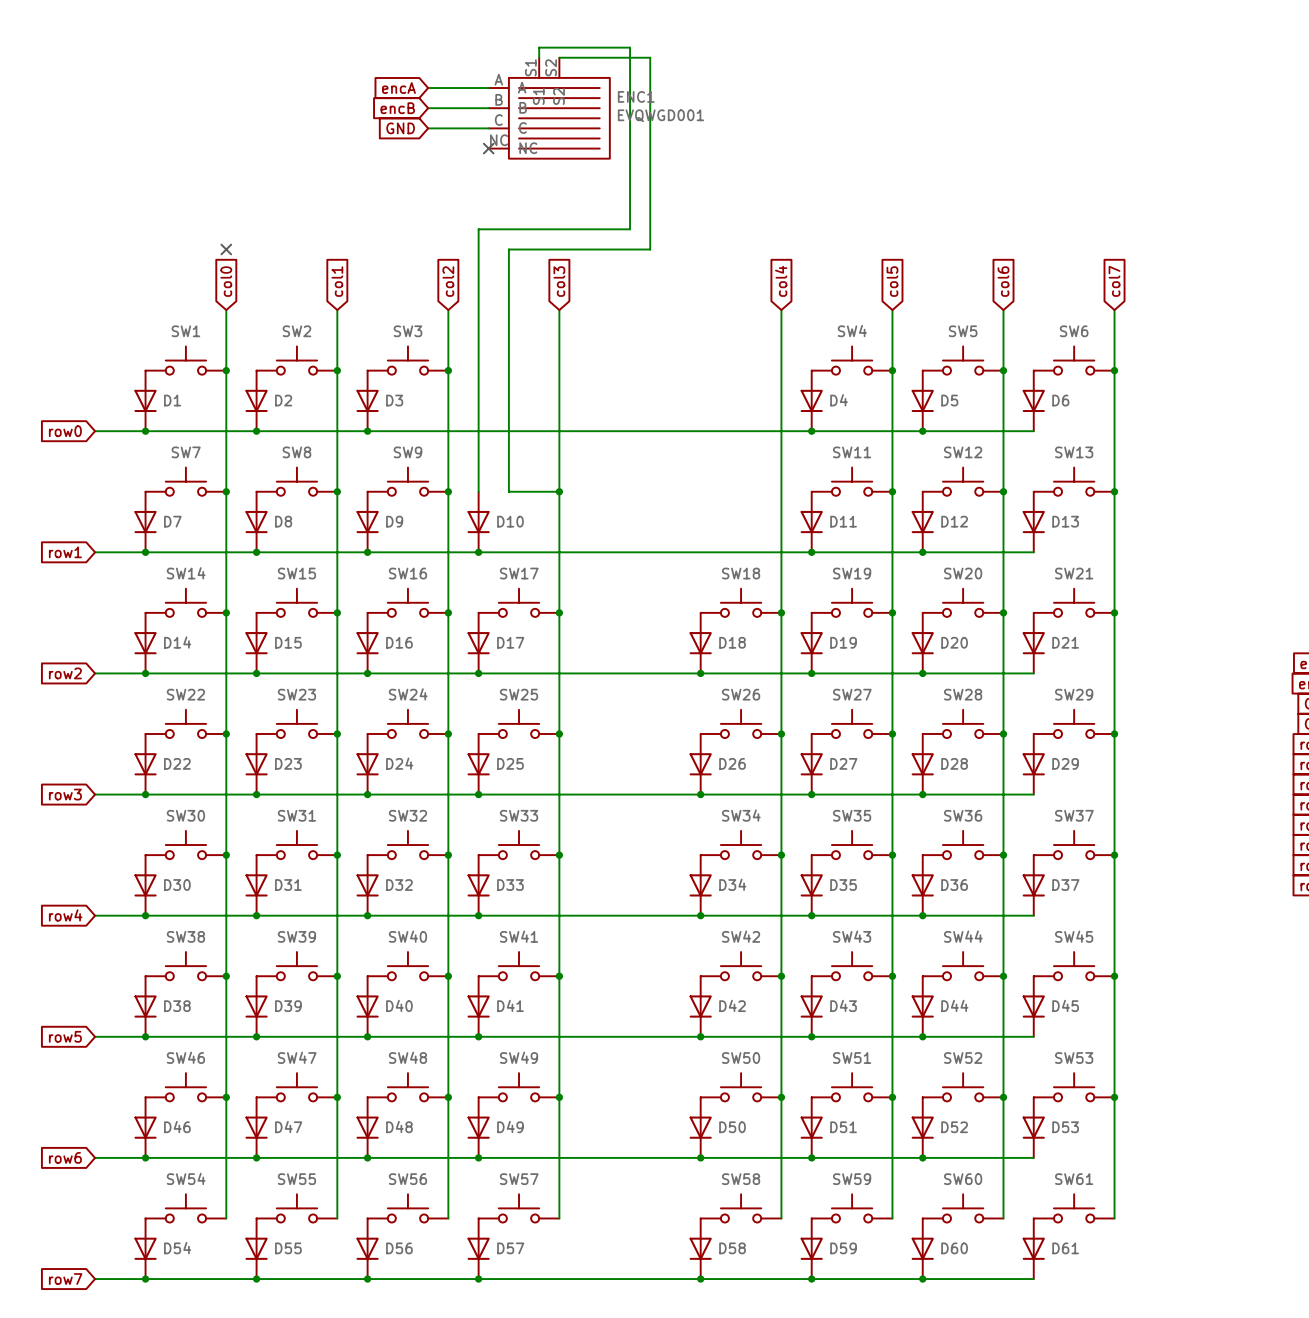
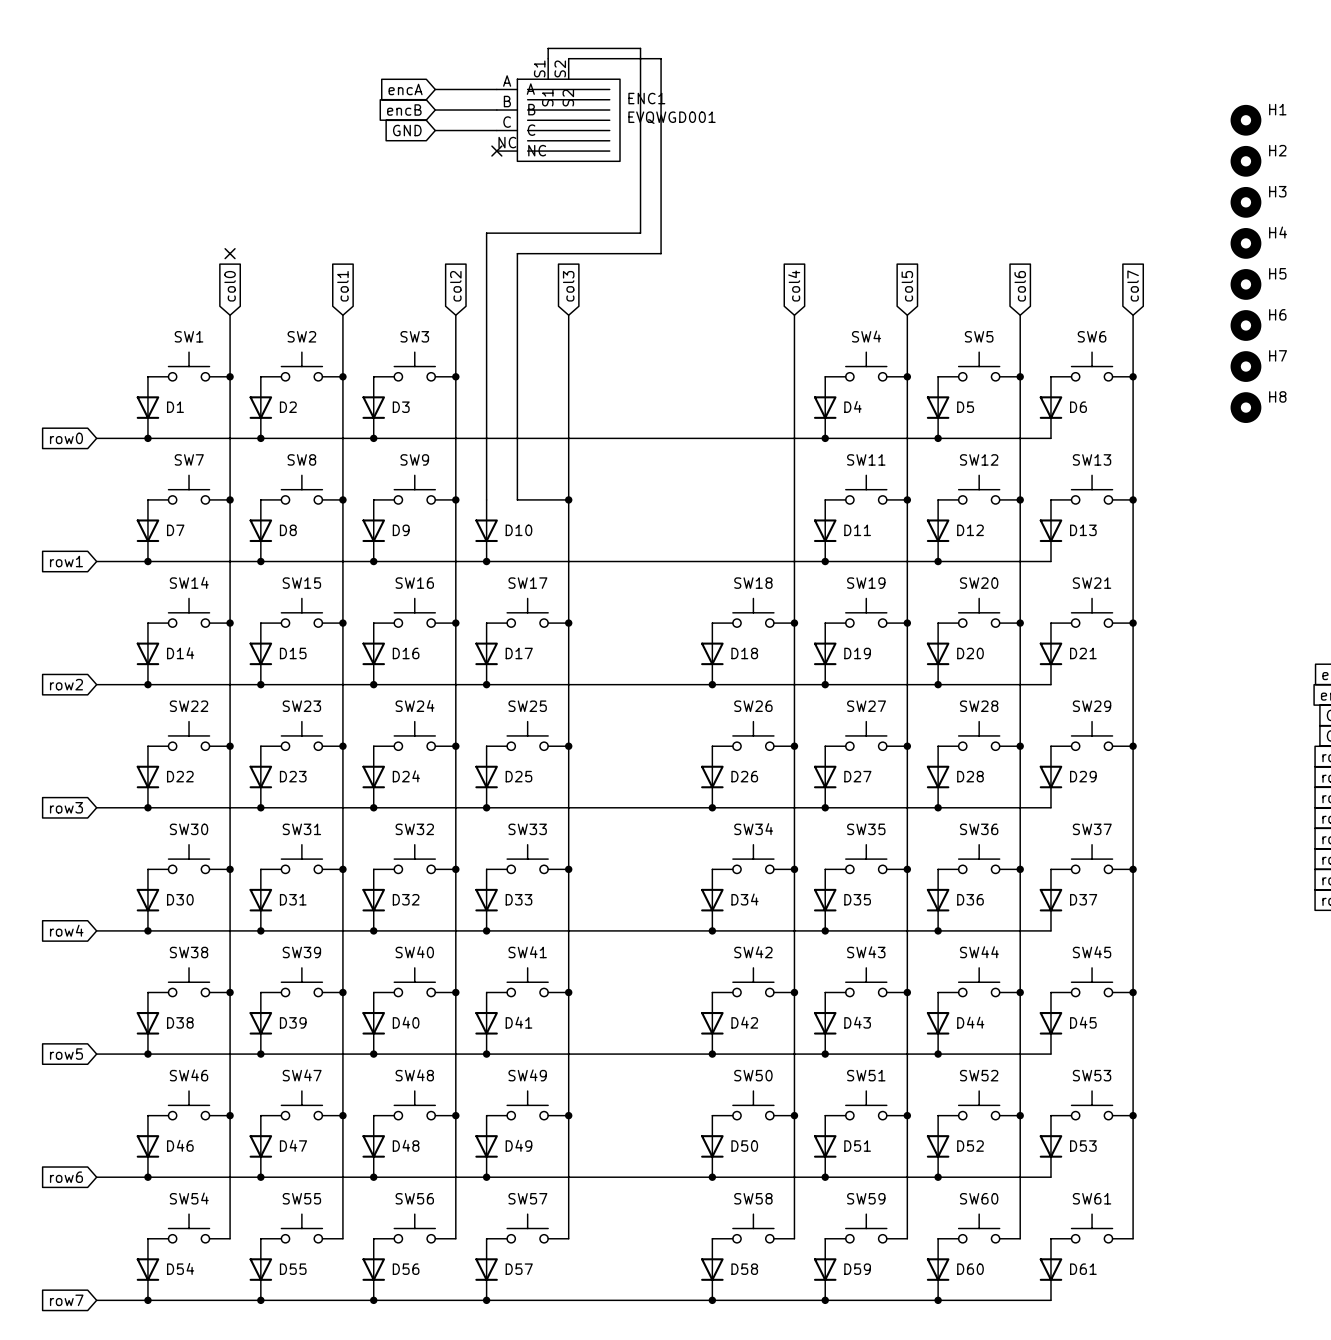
H1: none -> (1245, 120)
H2: none -> (1245, 161)
H3: none -> (1245, 202)
H4: none -> (1245, 243)
H5: none -> (1245, 284)
H6: none -> (1245, 325)
H7: none -> (1245, 366)
H8: none -> (1245, 407)

